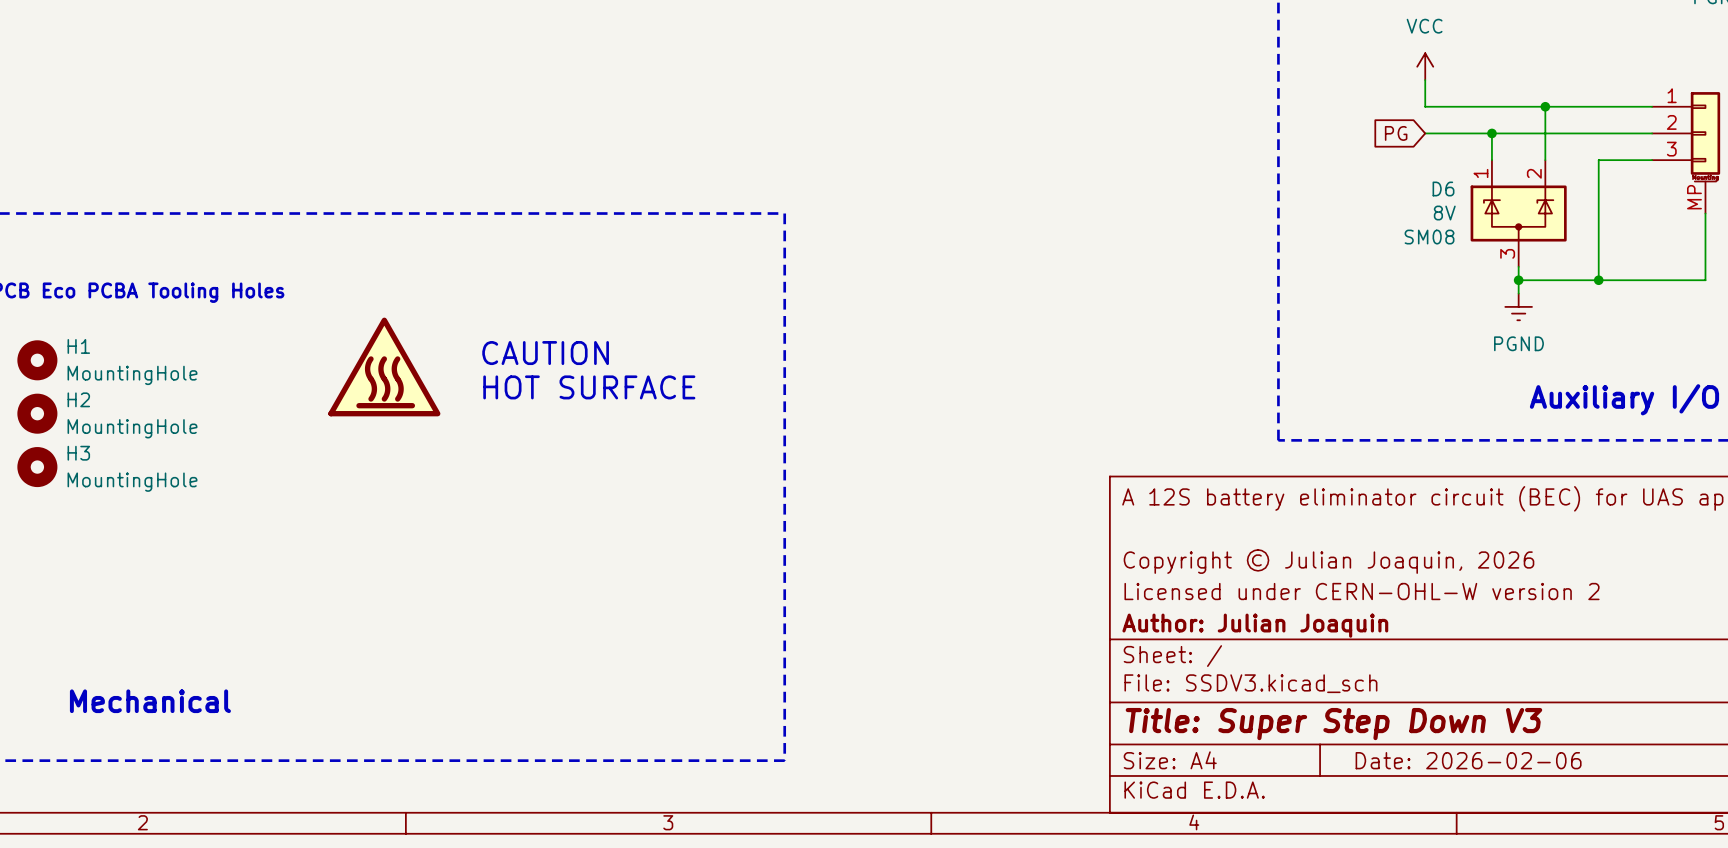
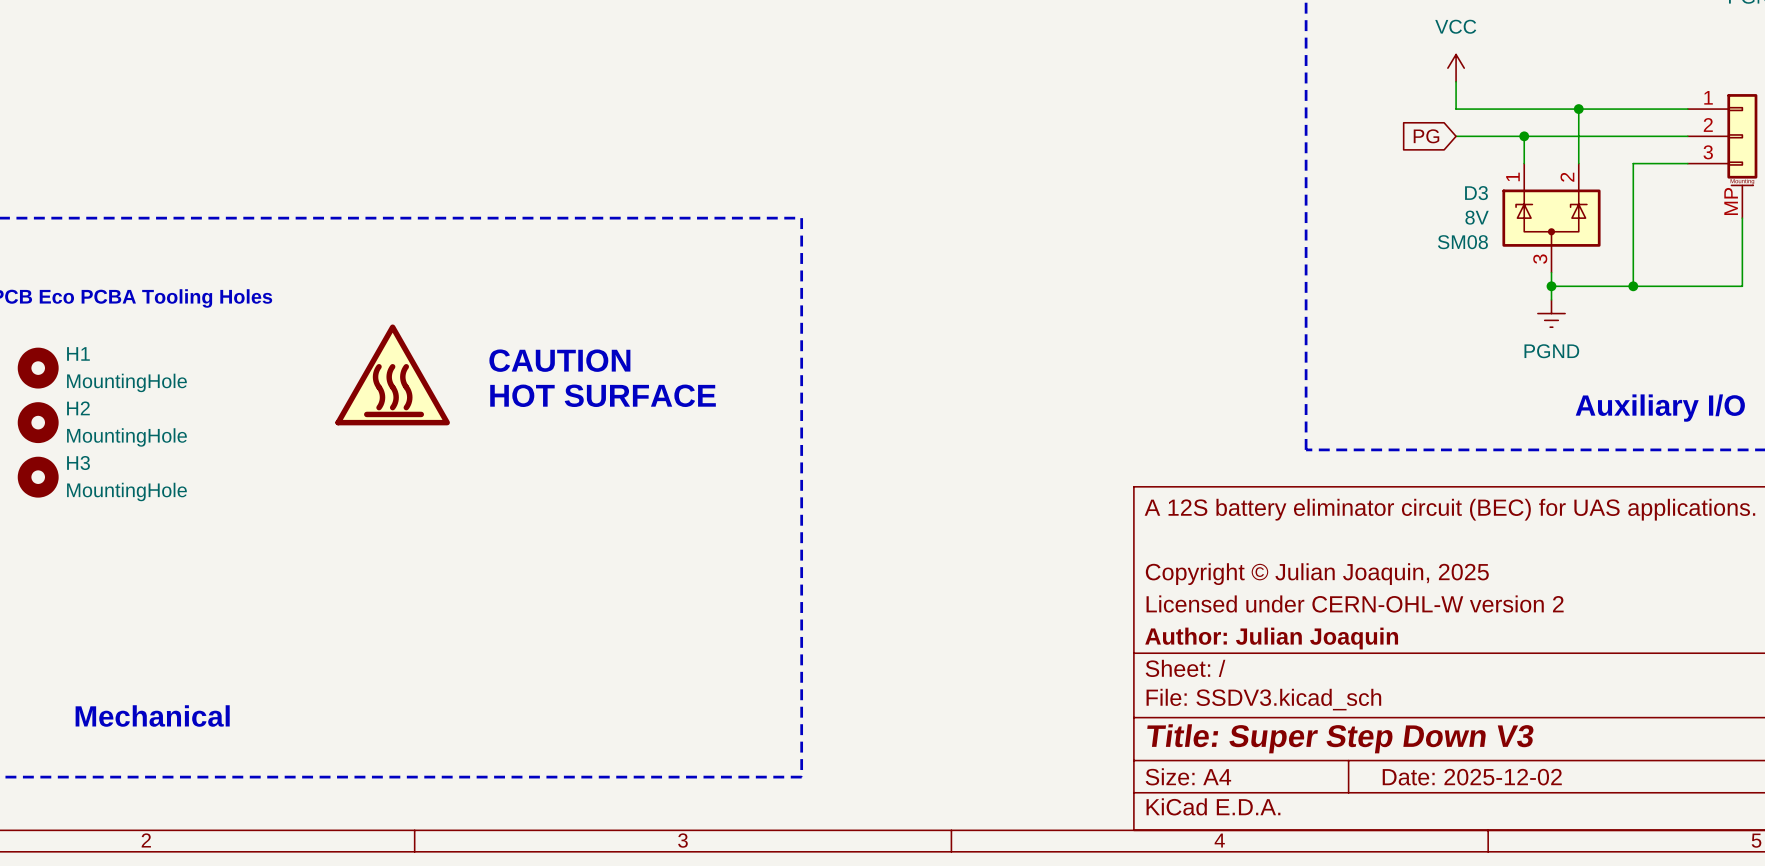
D6 name: D6 (1443, 188) -> D3 (1476, 193)
title block: Copyright © Julian Joaquin, 2026 (1328, 561) -> Copyright © Julian Joaquin, 2025 (1317, 574)
title block: Date: 2026-02-06 (1468, 760) -> Date: 2025-12-02 (1472, 777)

